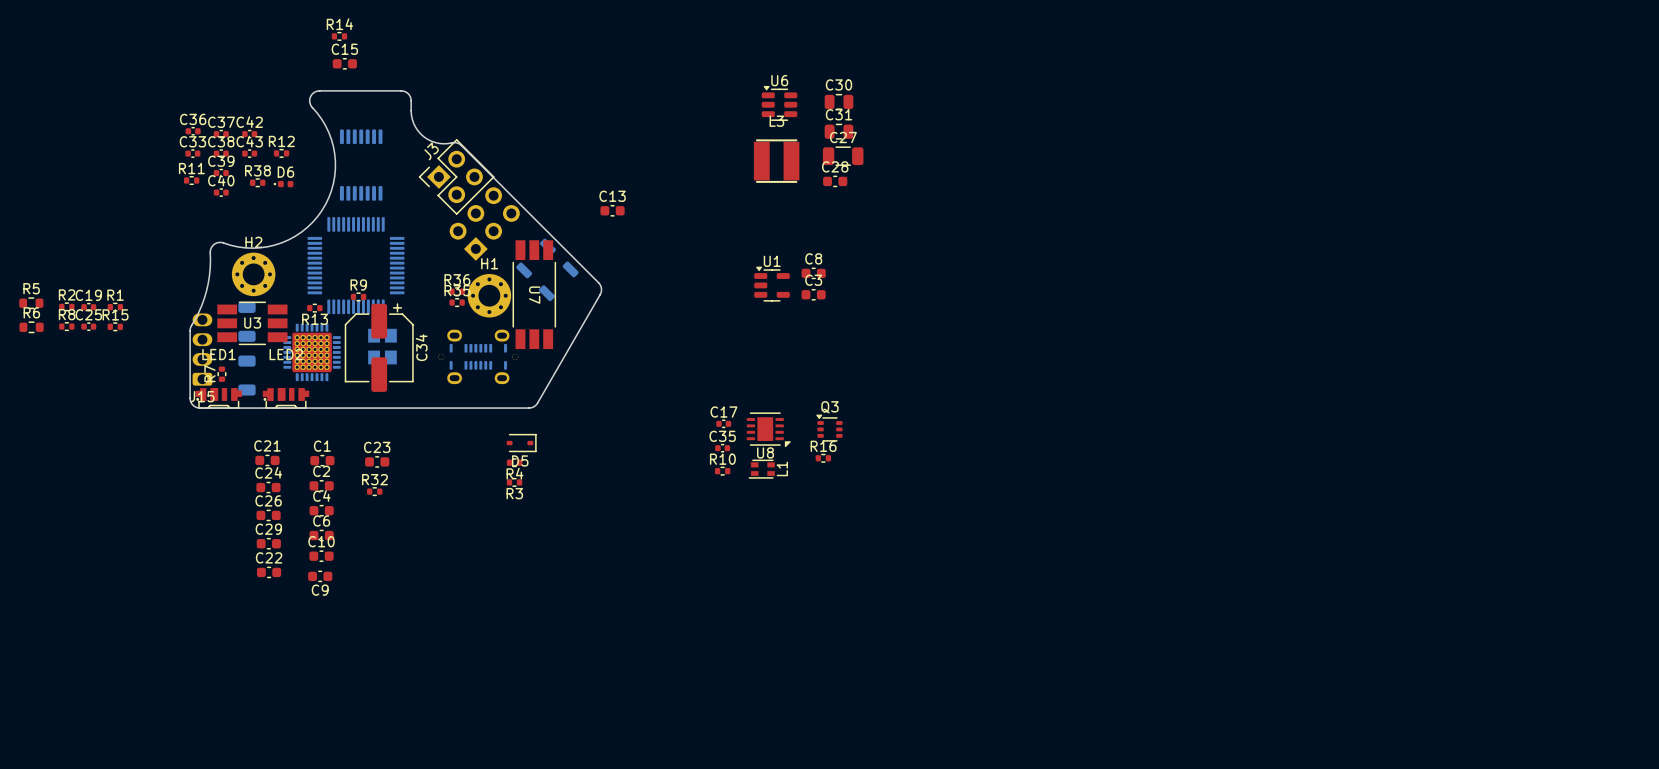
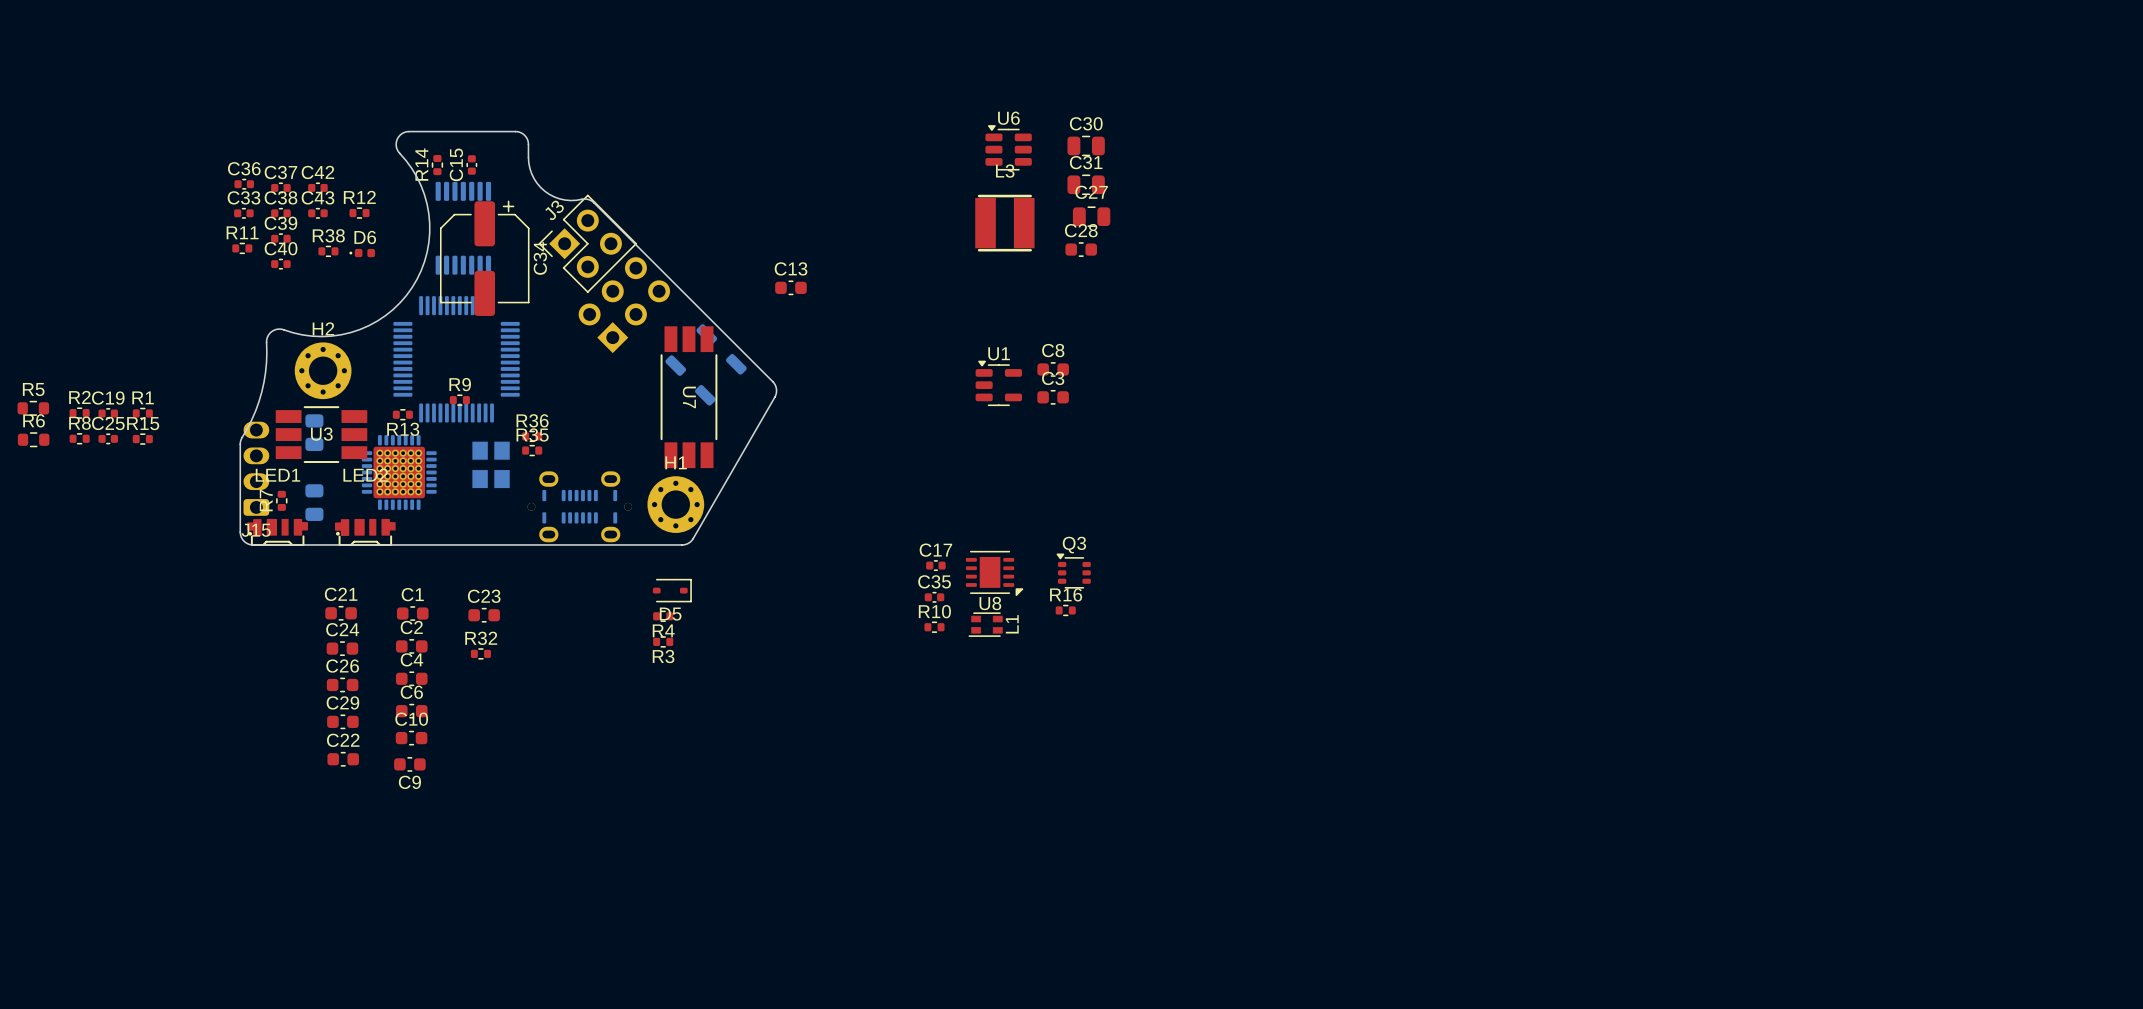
R14 rotation: 0° (339, 36) -> 90° clockwise (437, 165)
R14 position: (339, 36) -> (437, 165)
C15 footprint: [332, 58, 357, 70] -> [466, 155, 478, 175]
C27 footprint: [822, 146, 864, 166] -> [1072, 206, 1111, 227]
R36 position: (457, 291) -> (532, 436)
H1 position: (489, 295) -> (675, 504)
part footprint: [238, 301, 256, 342] -> [305, 414, 324, 452]
R35 position: (457, 302) -> (532, 450)
C34 position: (379, 347) -> (484, 258)
part footprint: [238, 355, 256, 396] -> [305, 484, 324, 521]
part position: (478, 356) -> (579, 506)

